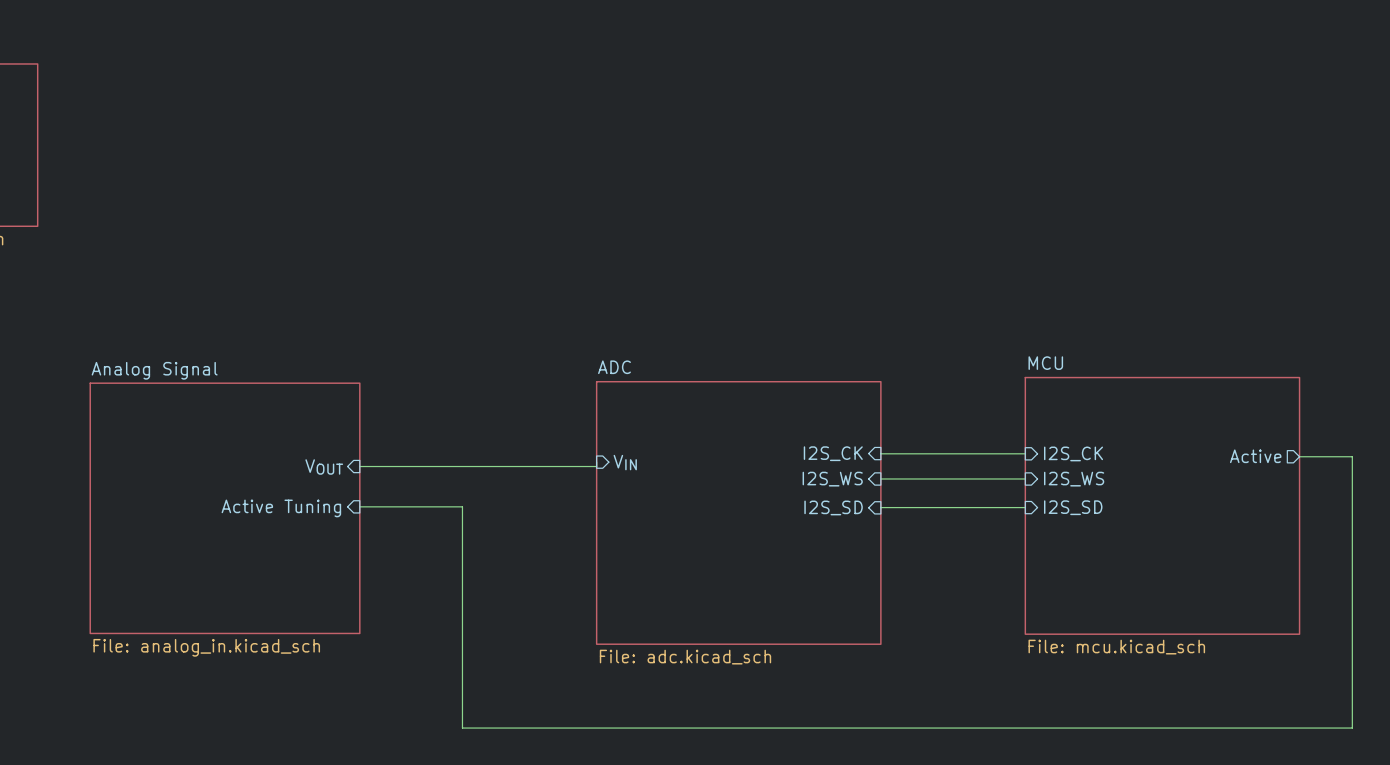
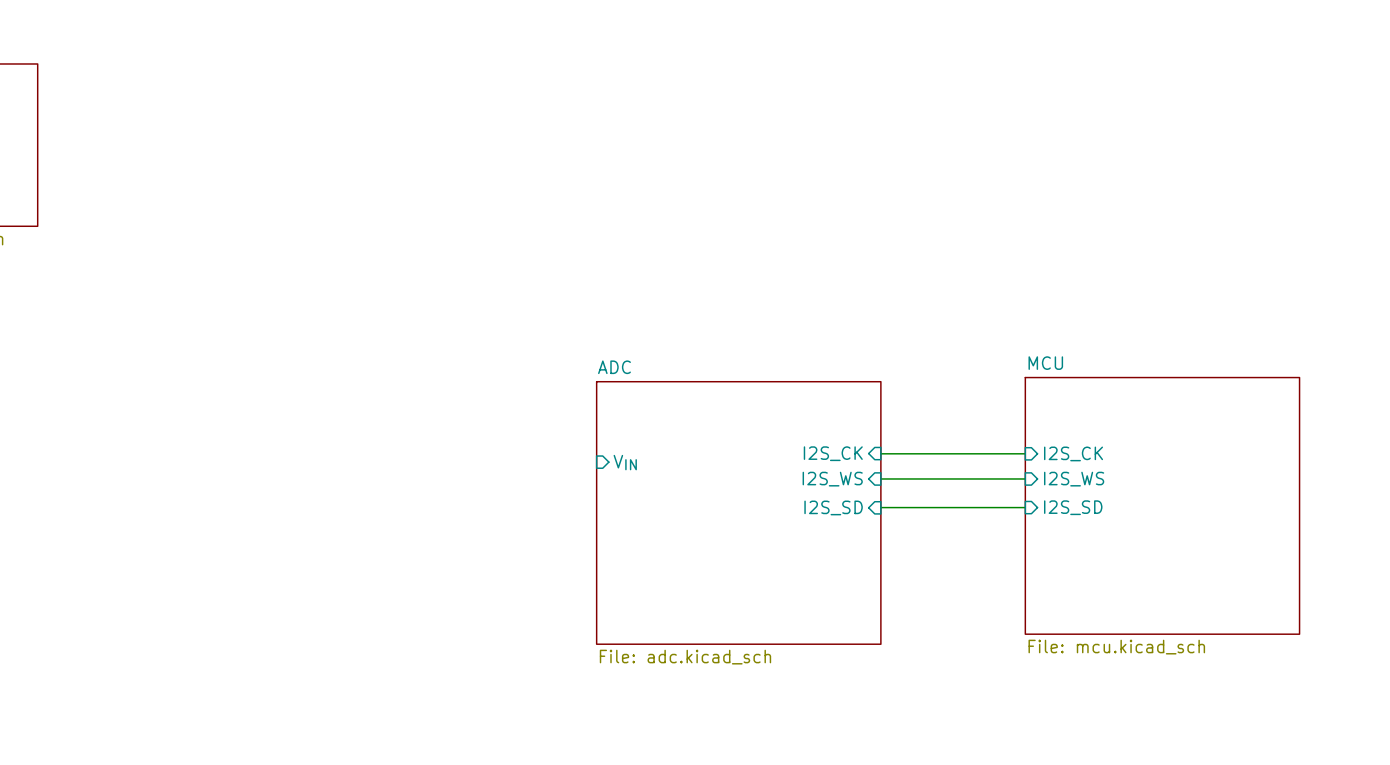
sheet pin: Active (1255, 456) -> none
wire: (1299, 456) (1352, 456) (1352, 728) (462, 728) (462, 506) (359, 506) -> none
wire: (596, 462) (596, 466) (359, 466) -> none
sheet pin: VOUT (324, 466) -> none
sheet Analog Signal: File: analog_in.kicad_sch (225, 508) -> none
sheet pin: Active Tuning (281, 508) -> none

